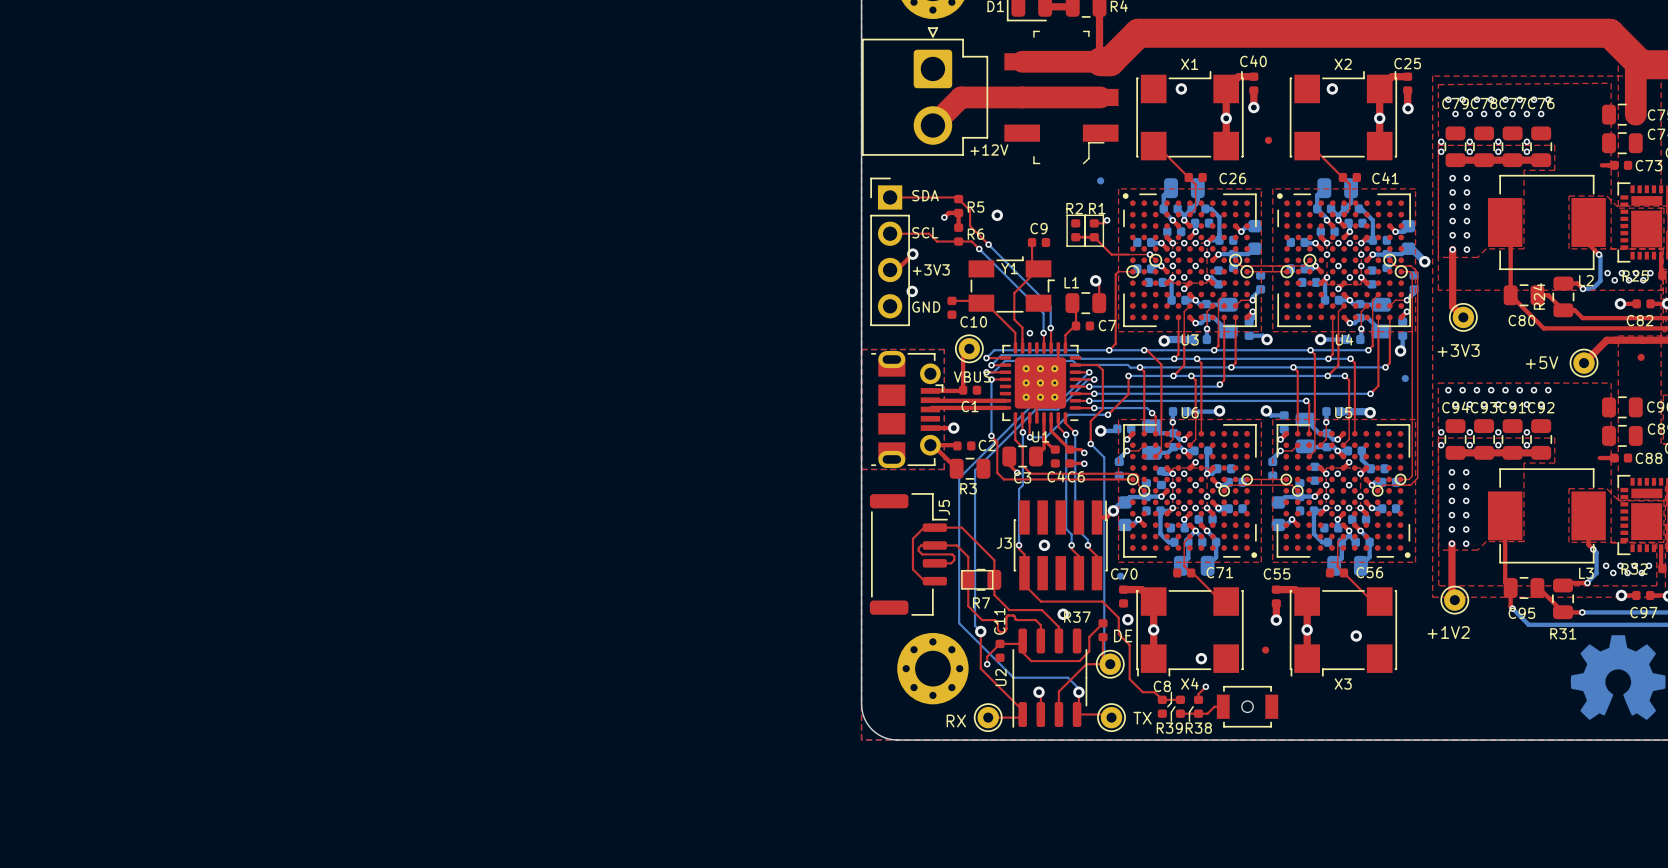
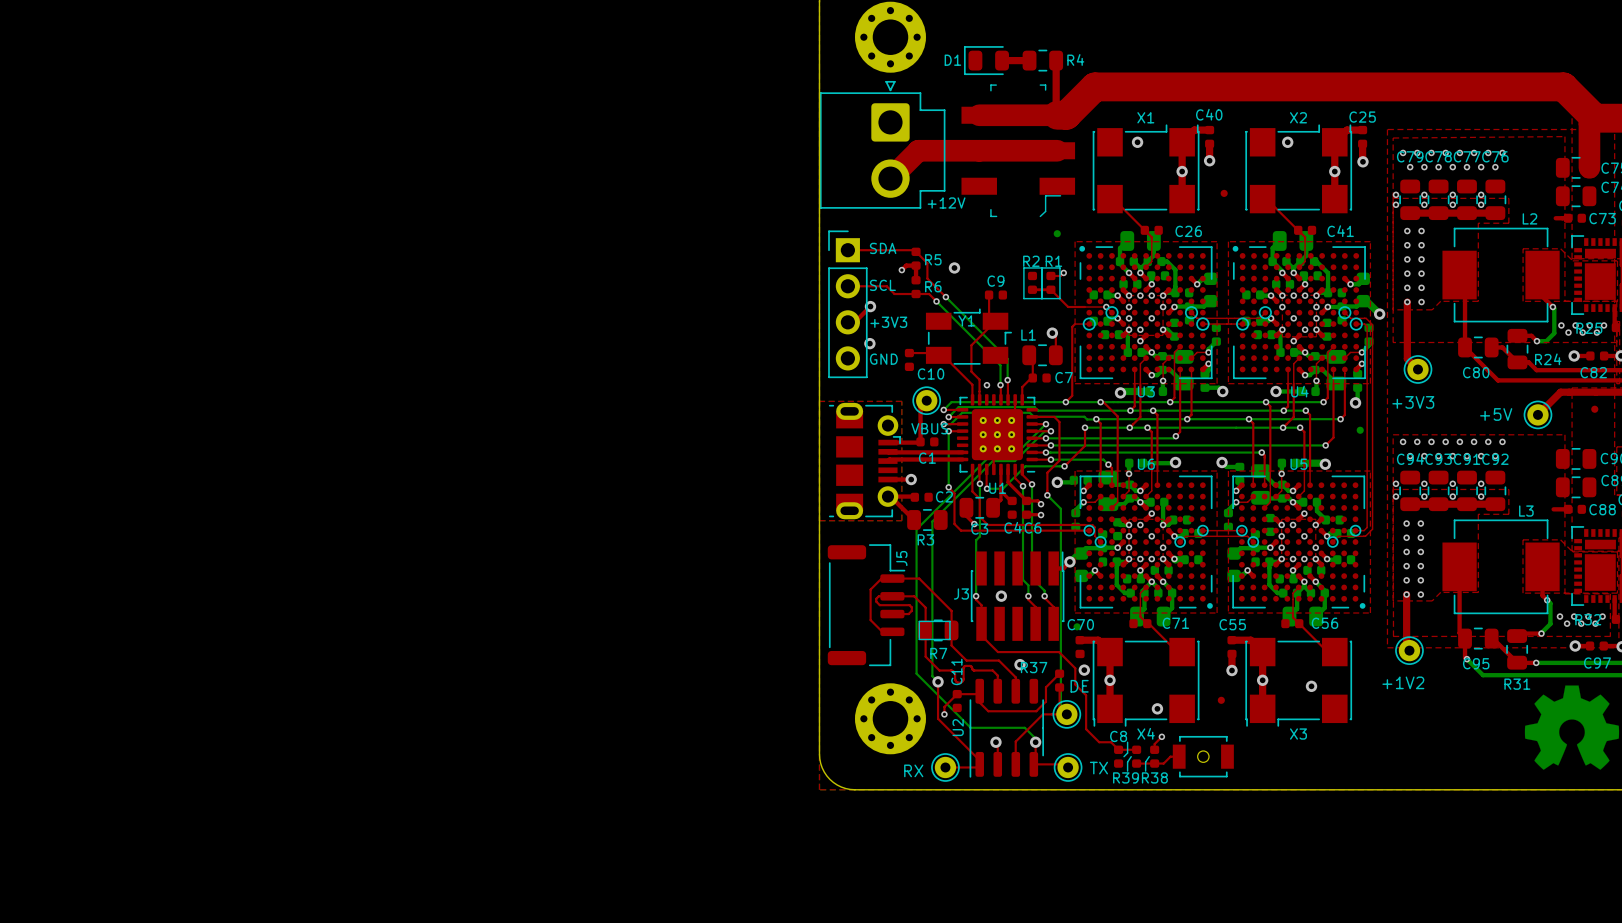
L2 name position: L2 (1586, 280) -> L2 (1529, 218)
R24 name rotation: 0° (1539, 296) -> 90° clockwise (1548, 359)
R24 name position: R24 (1539, 296) -> R24 (1548, 359)
L3 name position: L3 (1586, 573) -> L3 (1526, 511)

